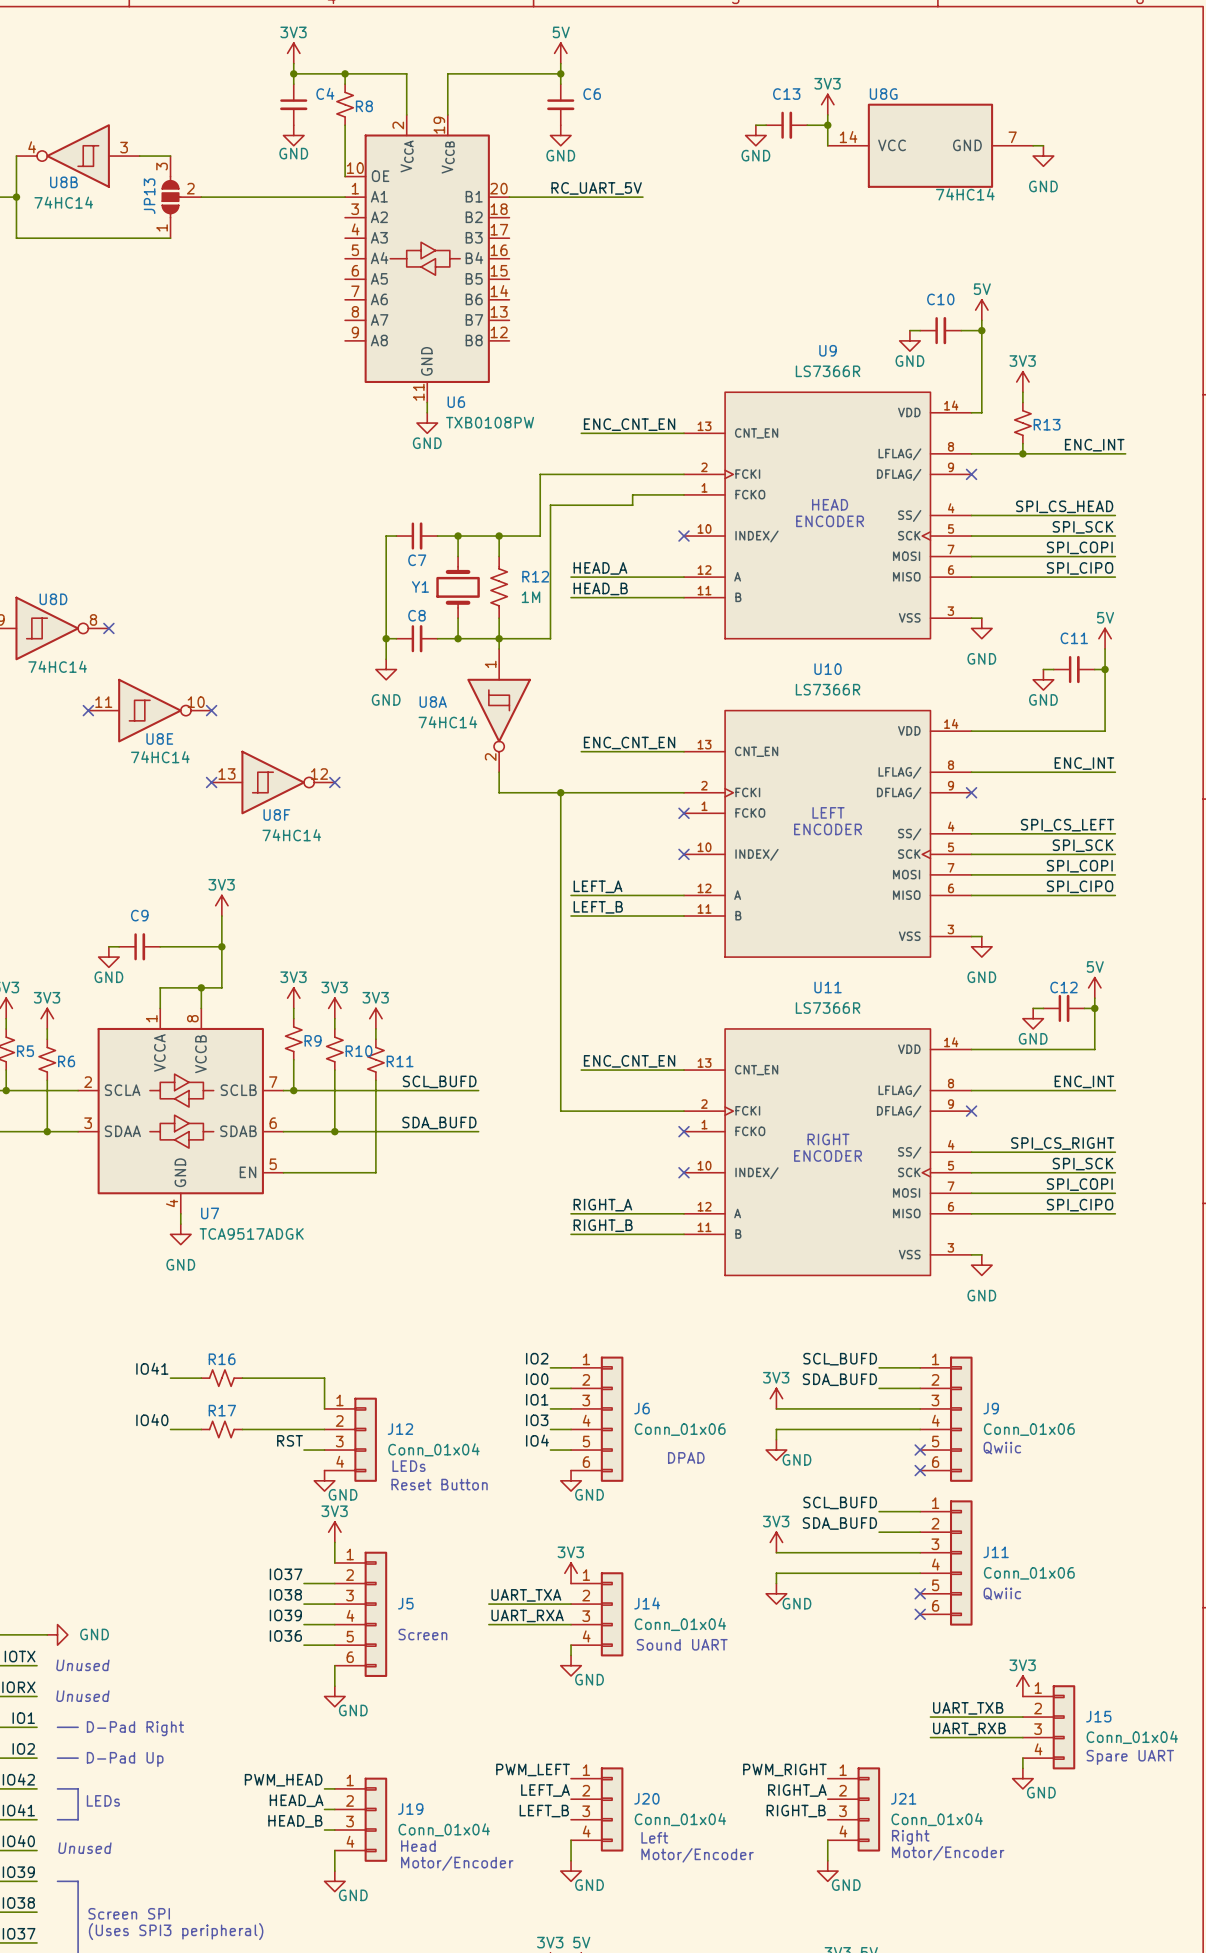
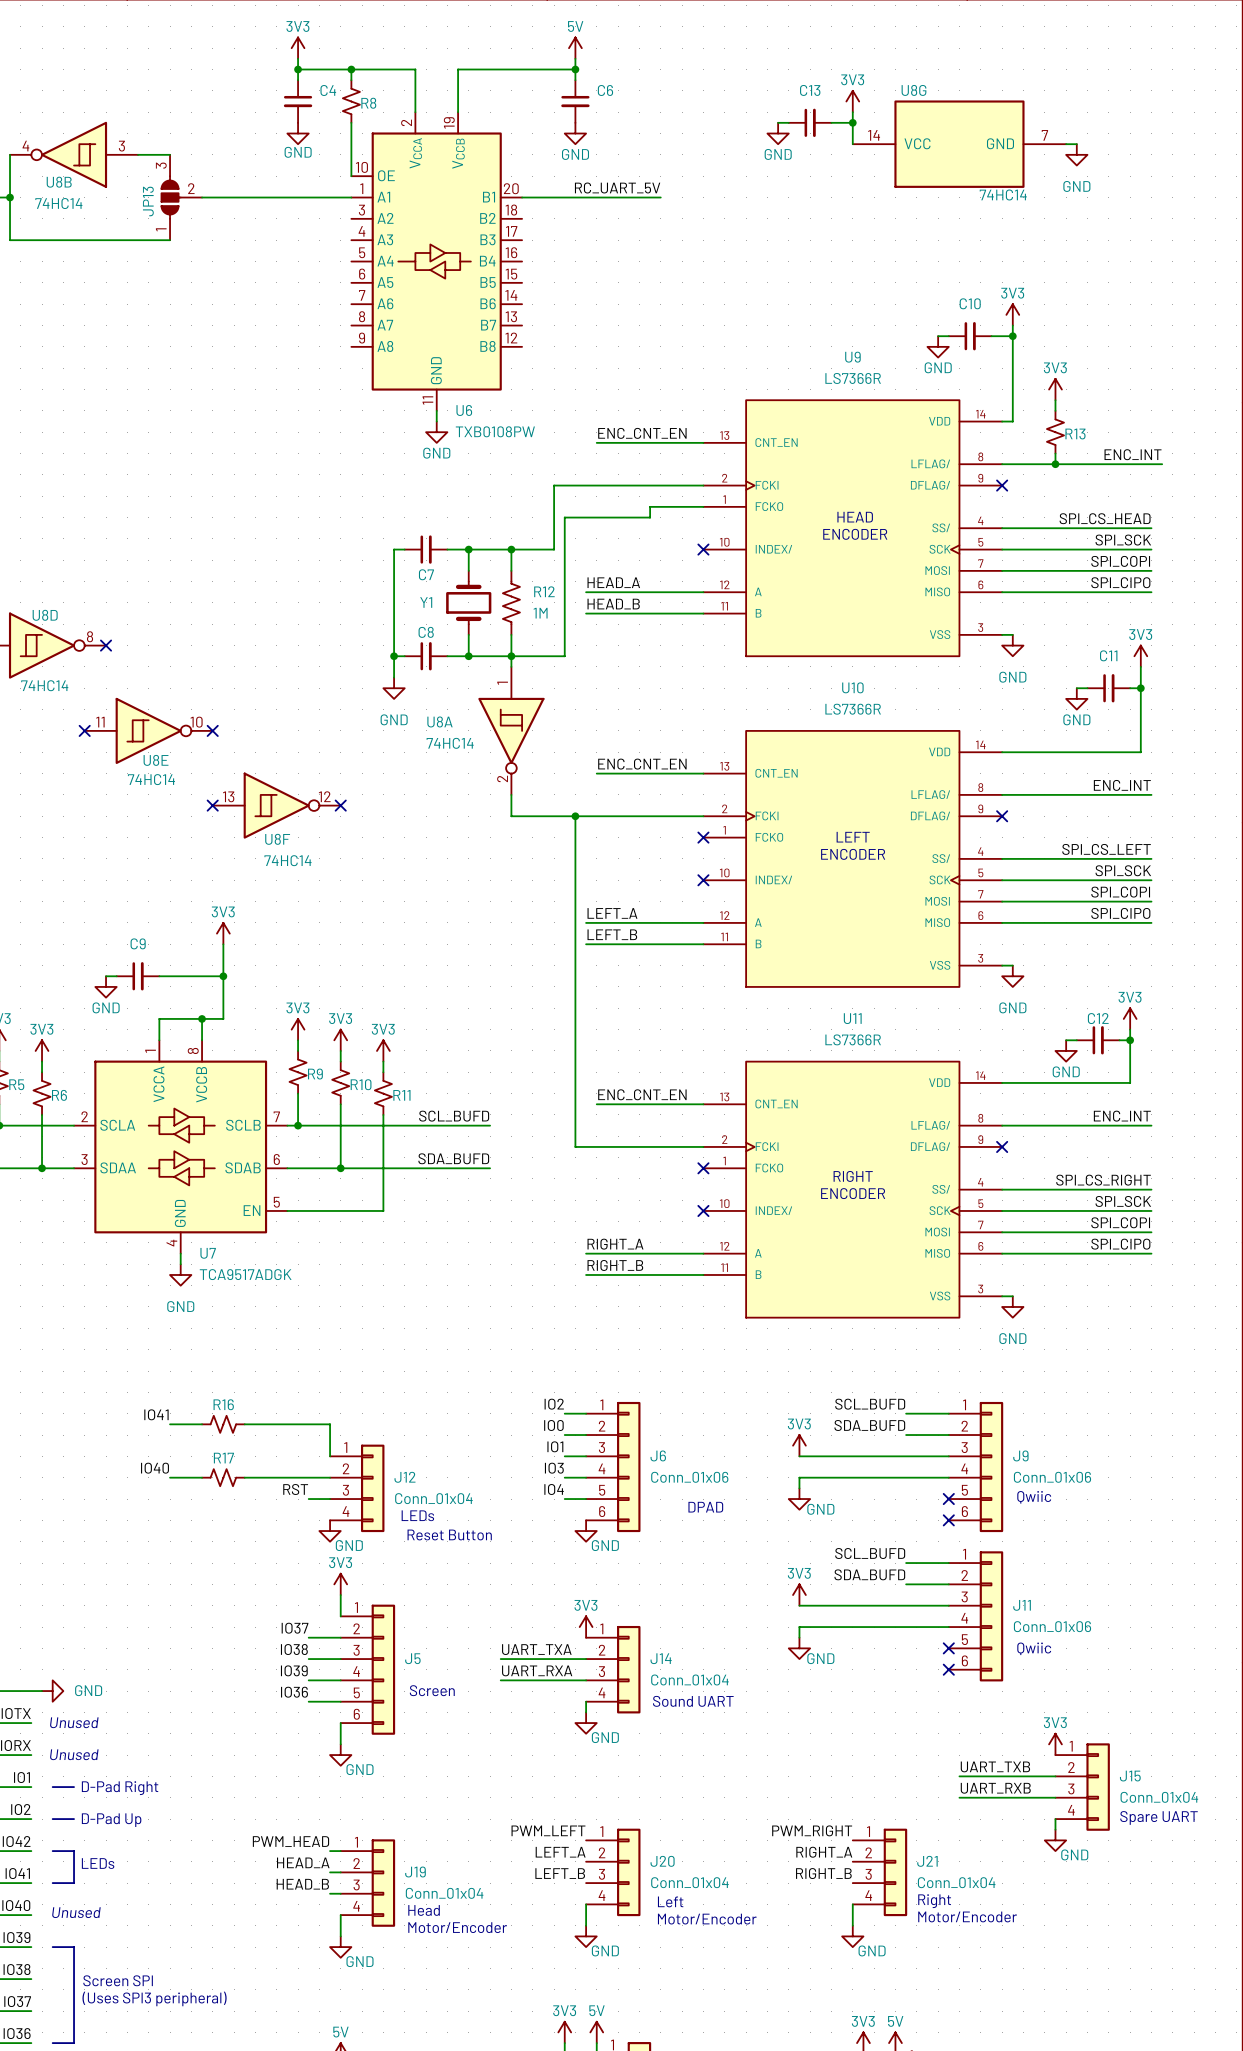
power symbol: 5V (981, 310) -> 3V3 (1012, 314)
power symbol: 5V (1105, 638) -> 3V3 (1140, 656)
power symbol: 5V (1094, 987) -> 3V3 (1130, 1018)

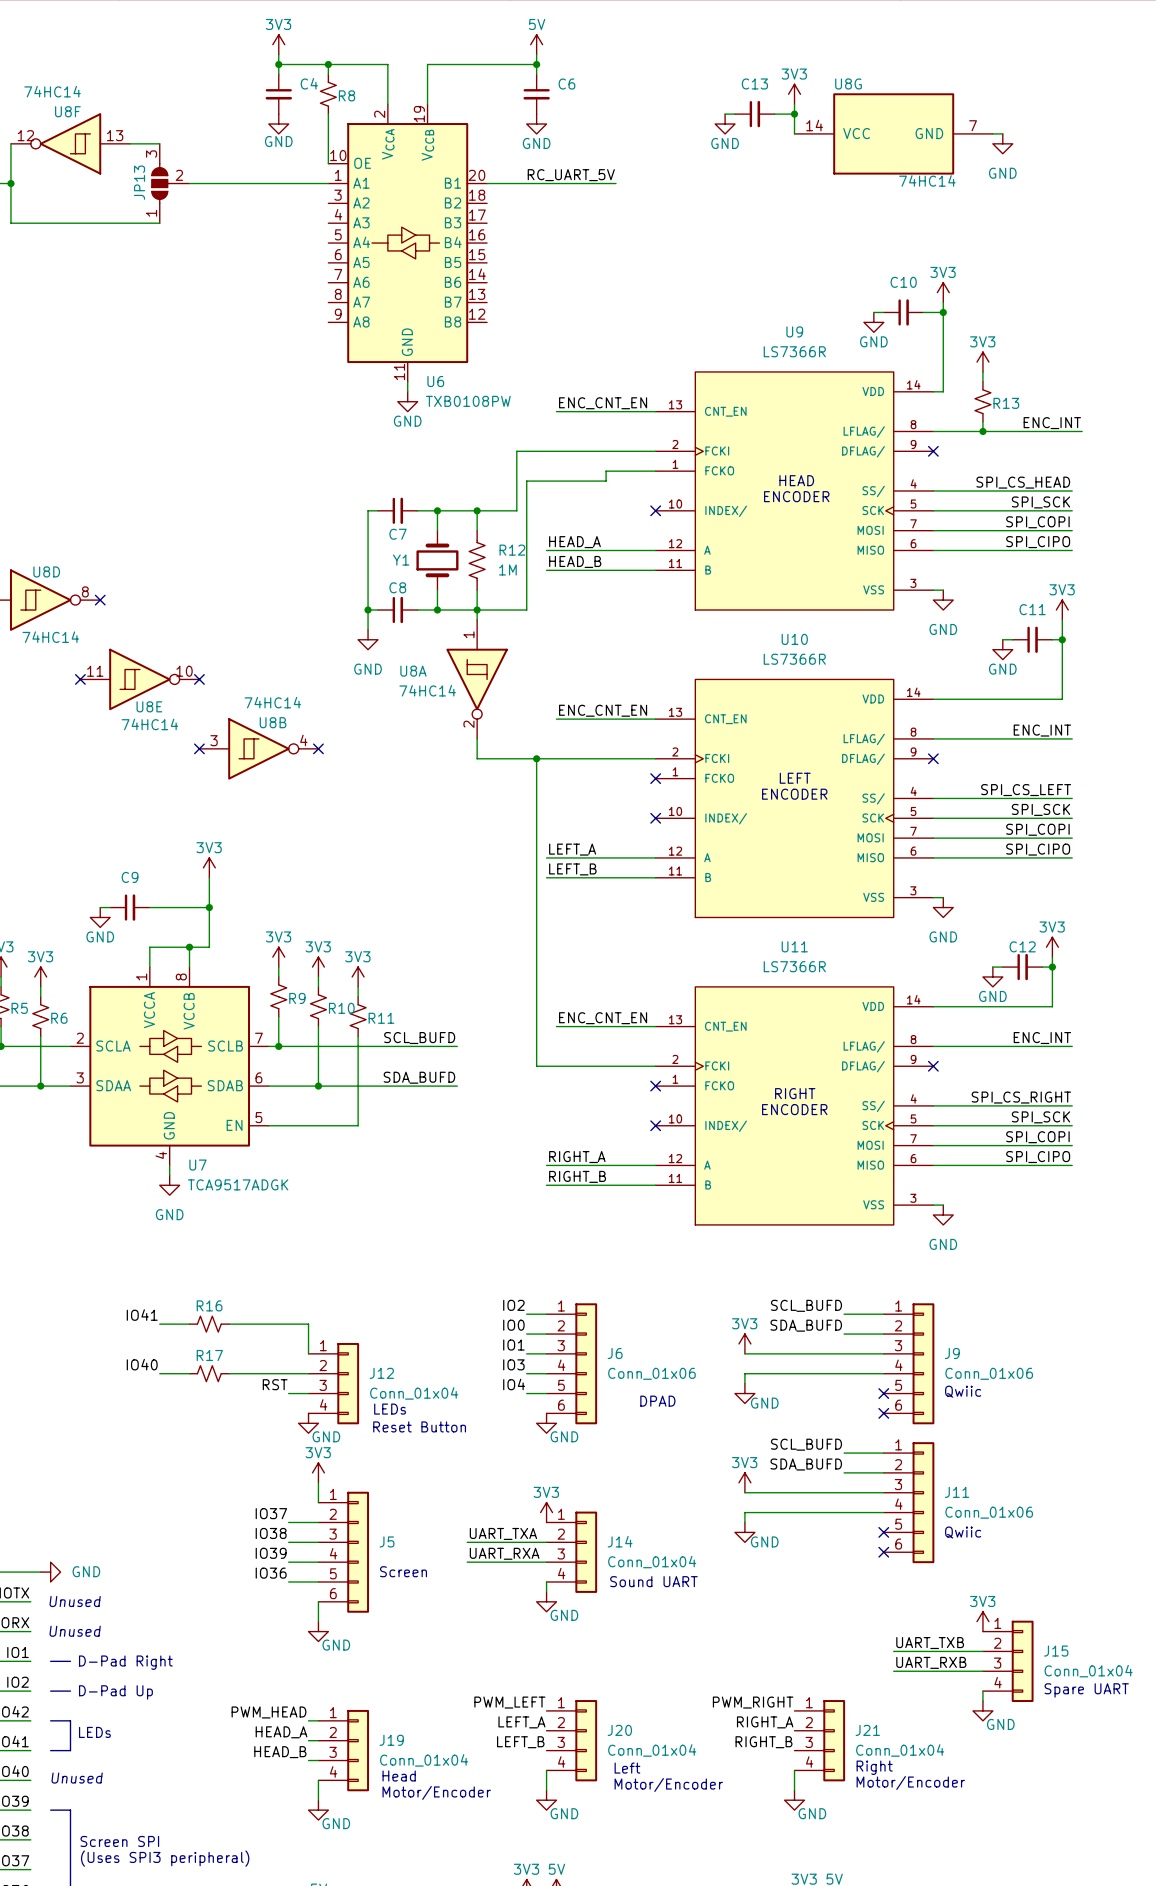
U8B rotation: 0° (74, 154) -> 180° (258, 748)
U8B position: (74, 154) -> (258, 748)
U8F rotation: 0° (276, 805) -> 180° (70, 143)
U8F position: (276, 805) -> (70, 143)

